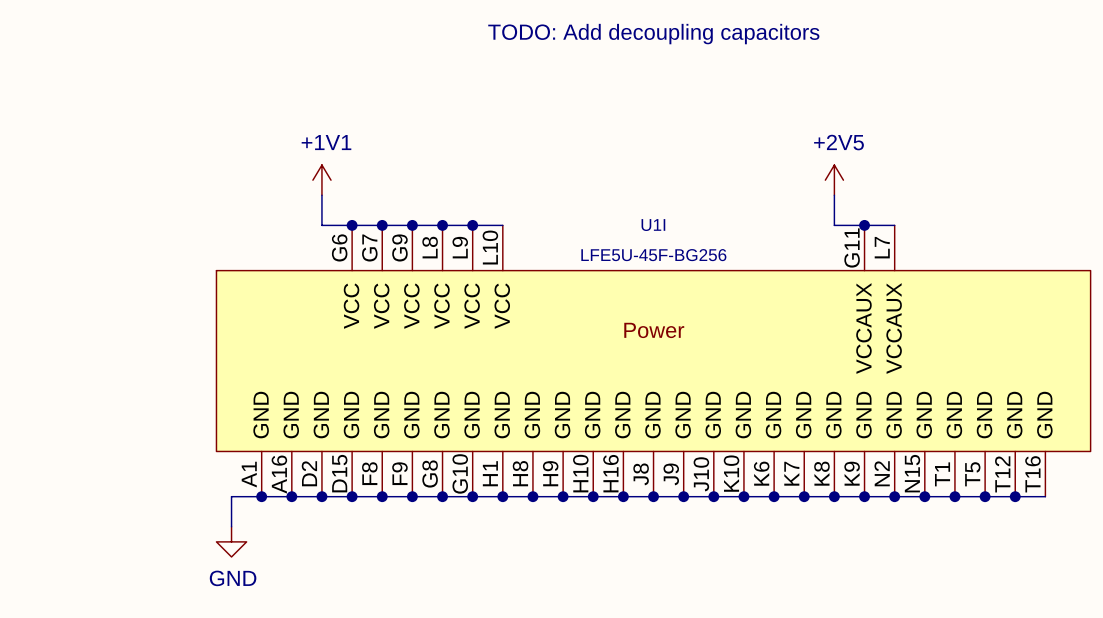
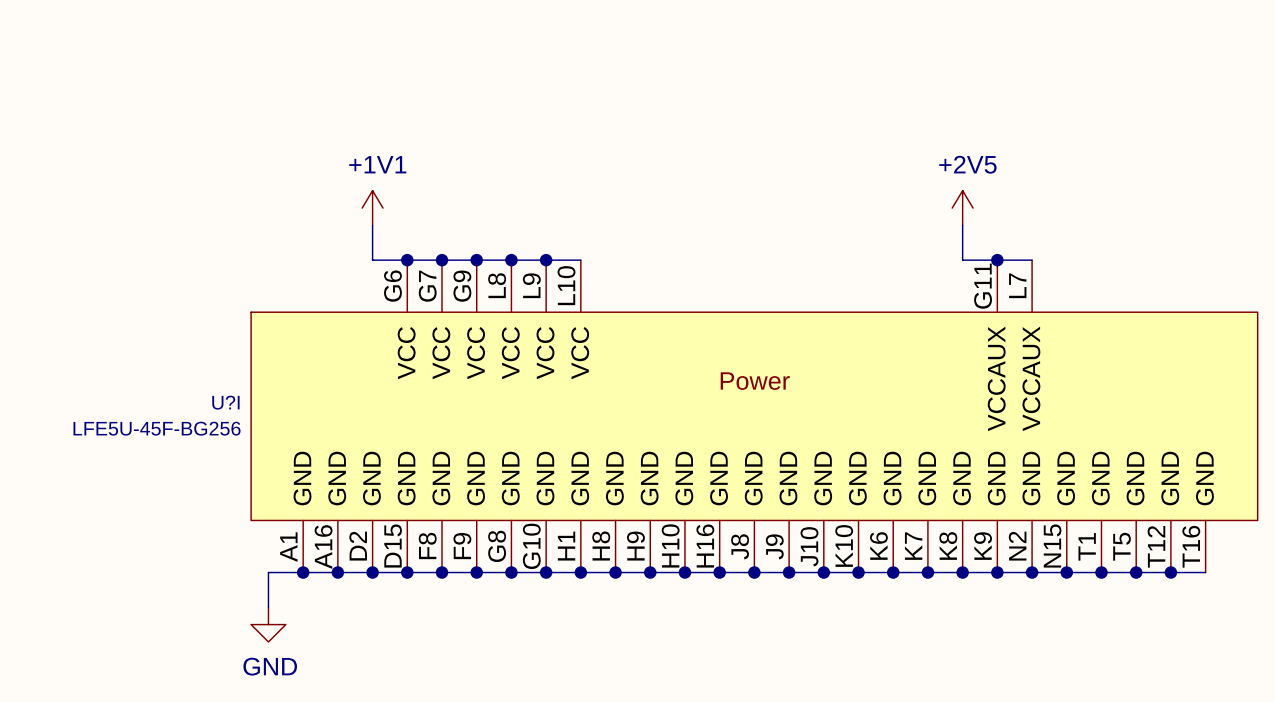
text: TODO: Add decoupling capacitors (653, 34) -> none
U1I name: U1I (653, 225) -> U?I (225, 402)
U1I value position: LFE5U-45F-BG256 (653, 255) -> LFE5U-45F-BG256 (157, 428)

